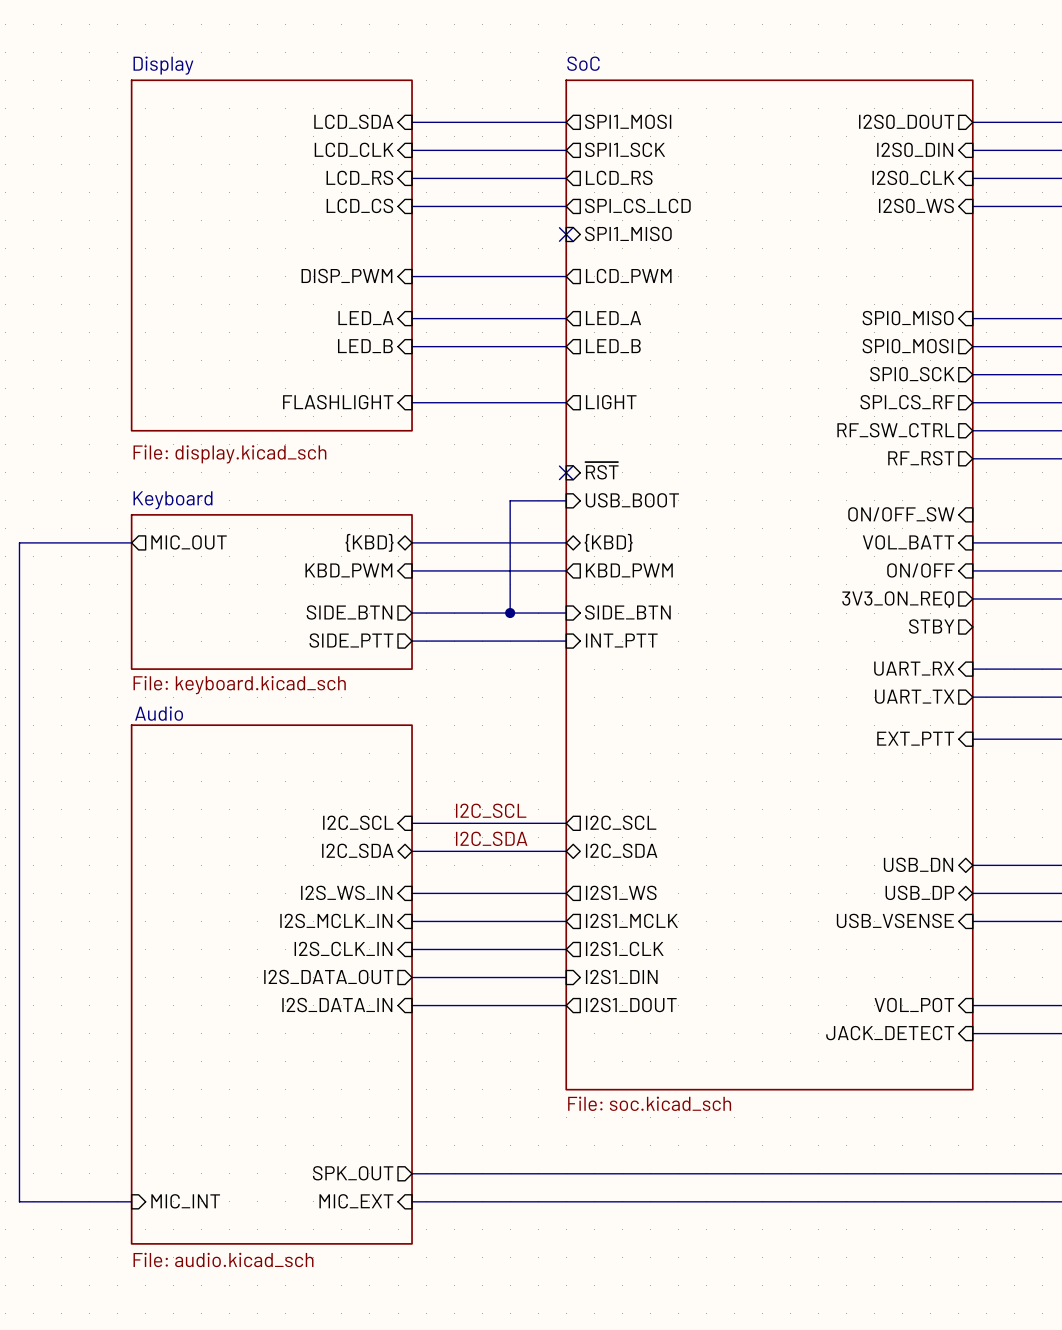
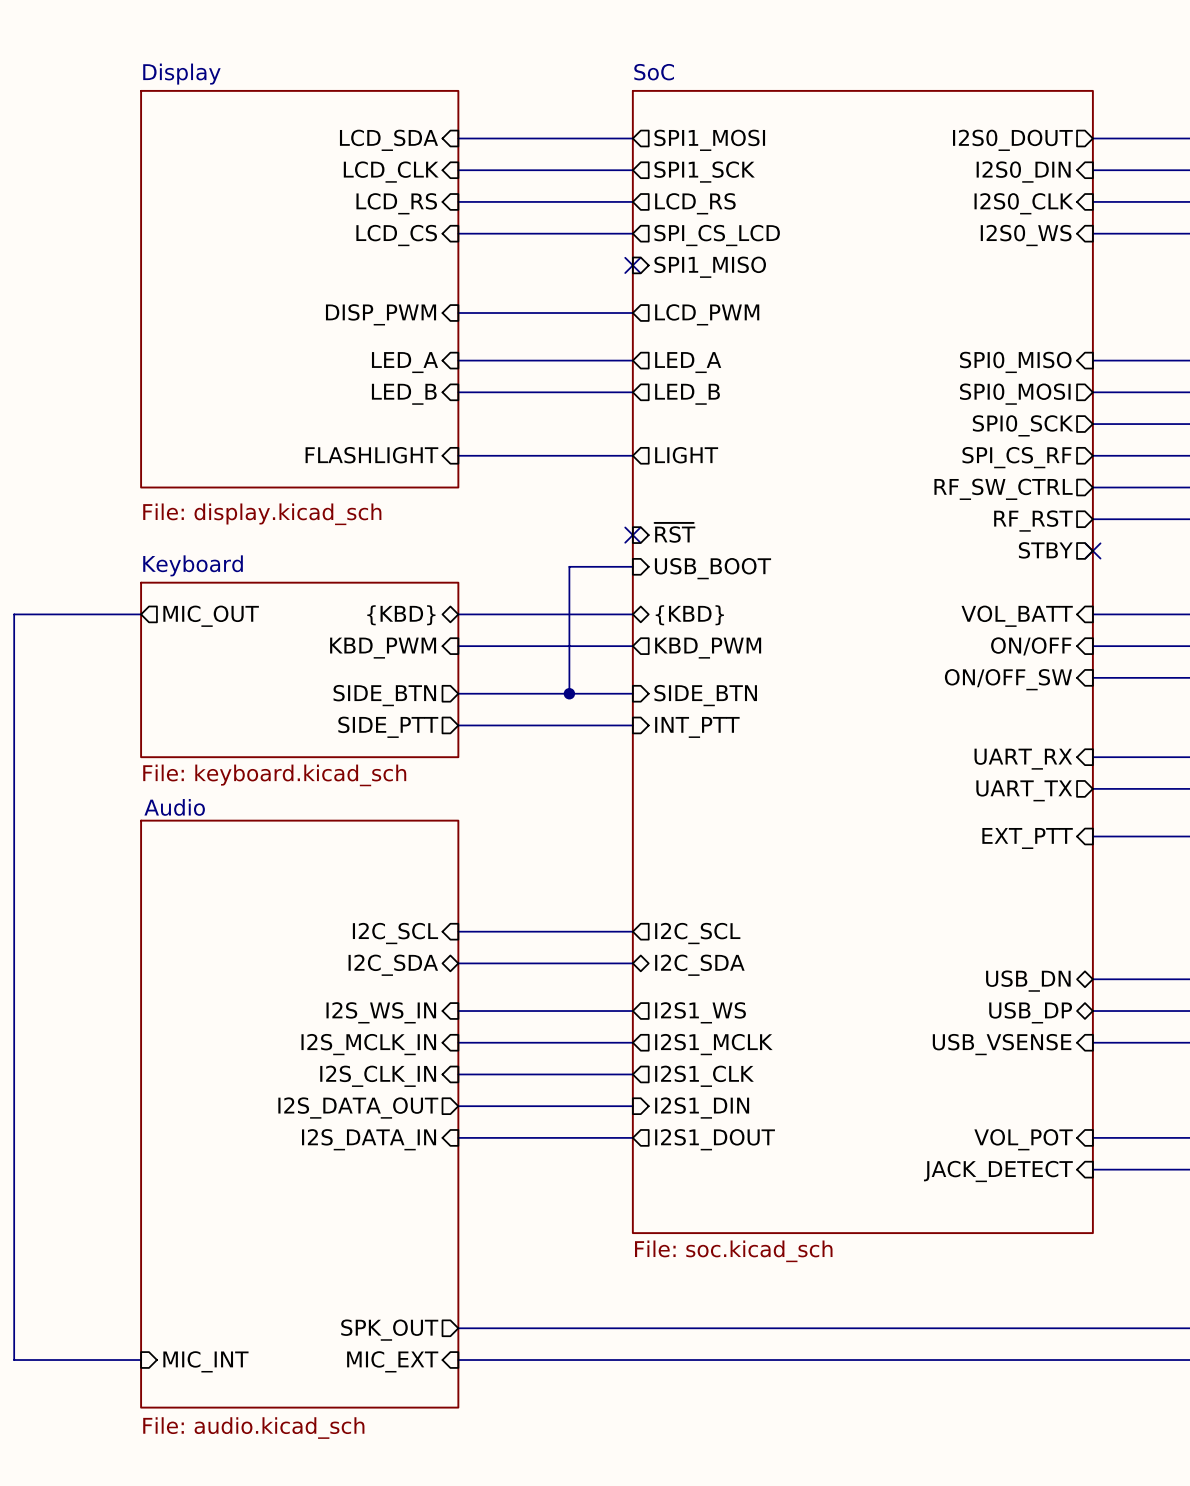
no-connect mark: none -> (1092, 550)
sheet pin: ON/OFF_SW (901, 514) -> none
sheet pin shape: output (898, 599) -> input (1008, 679)
sheet pin: 3V3_ON_REQ (898, 599) -> ON/OFF_SW (1008, 679)
sheet pin position: STBY (931, 626) -> STBY (1045, 550)
label: I2C_SCL (491, 810) -> none
label: I2C_SDA (491, 838) -> none

